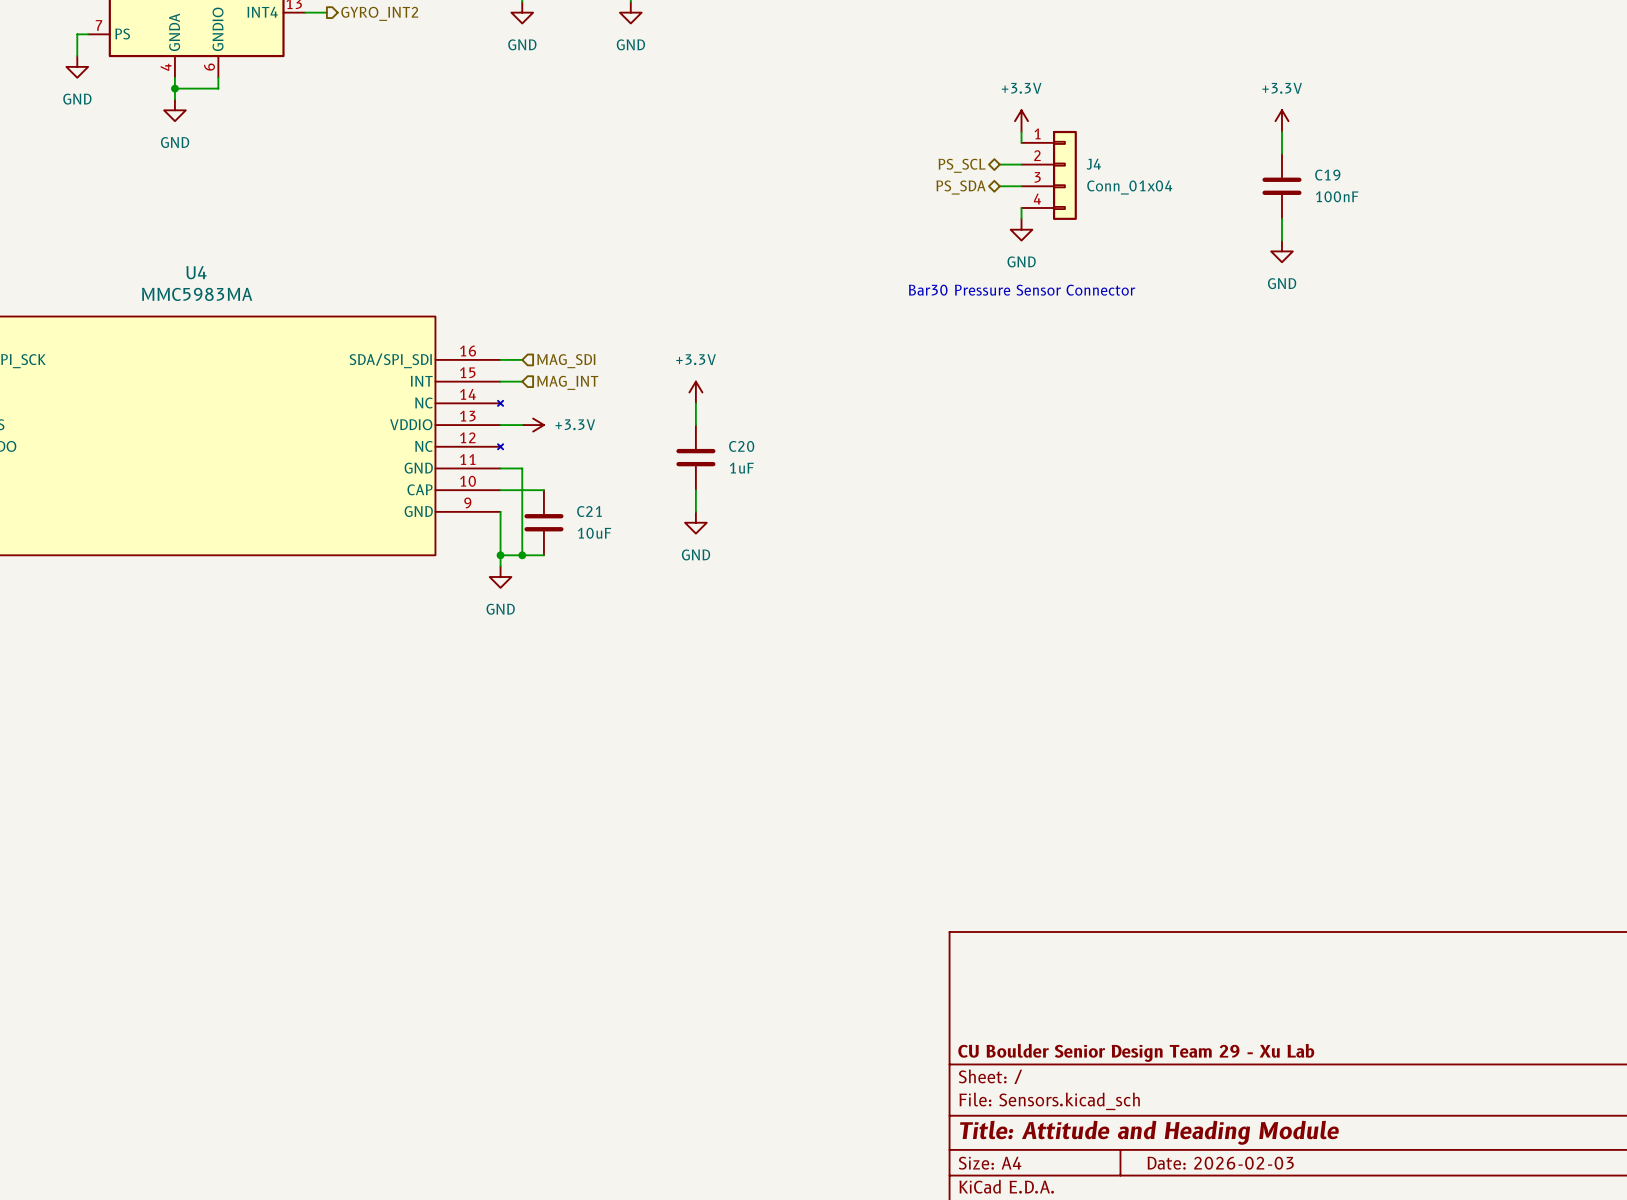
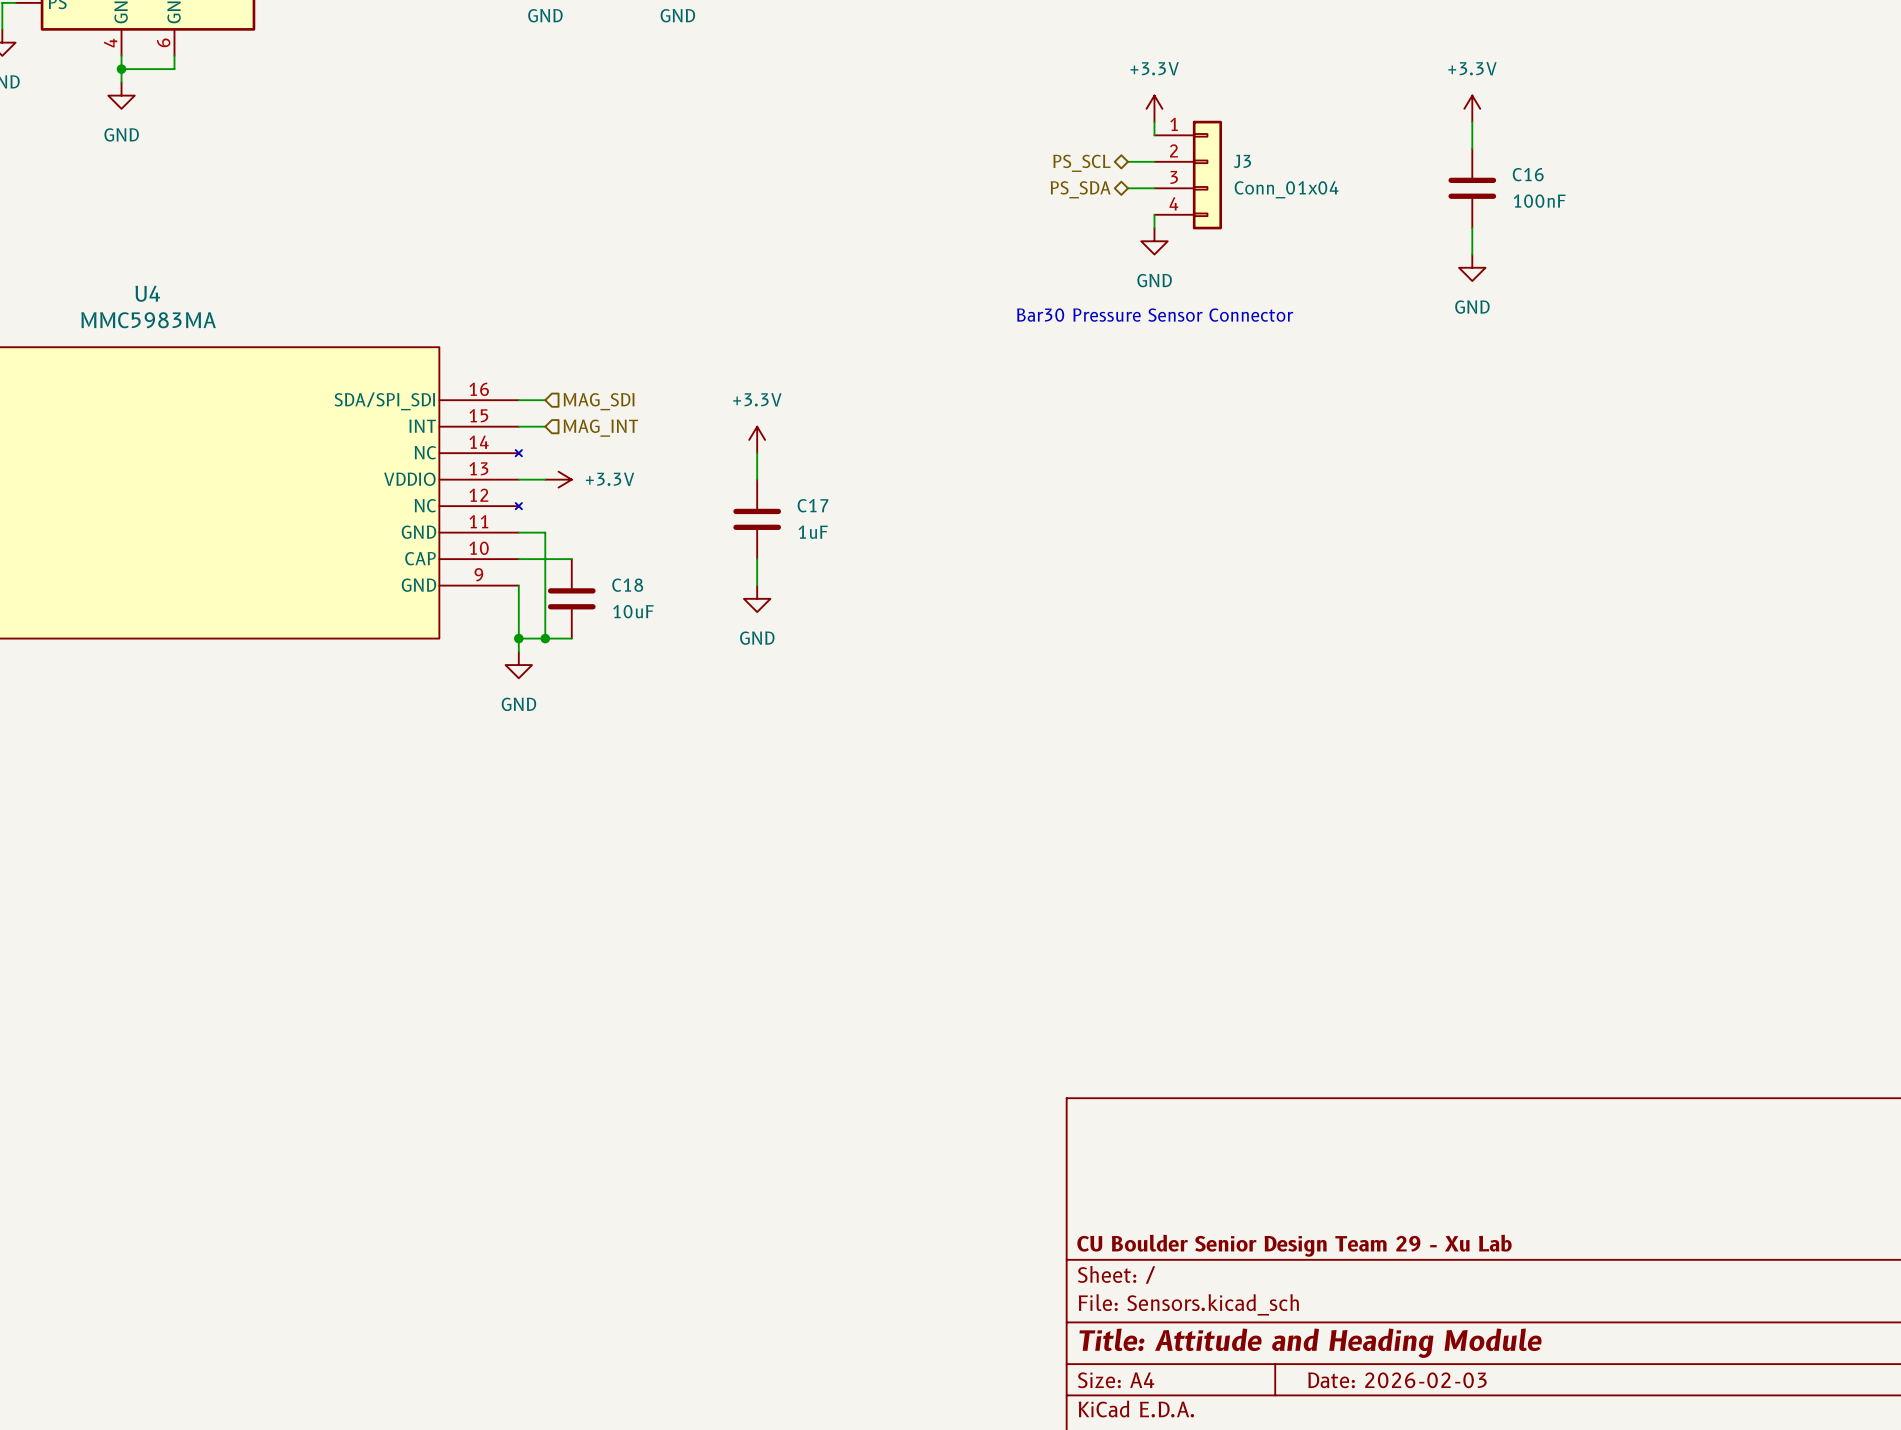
J4 name: J4 (1093, 164) -> J3 (1242, 161)
C19 name: C19 (1327, 175) -> C16 (1528, 174)
C20 name: C20 (741, 446) -> C17 (812, 505)
C21 name: C21 (589, 511) -> C18 (627, 585)

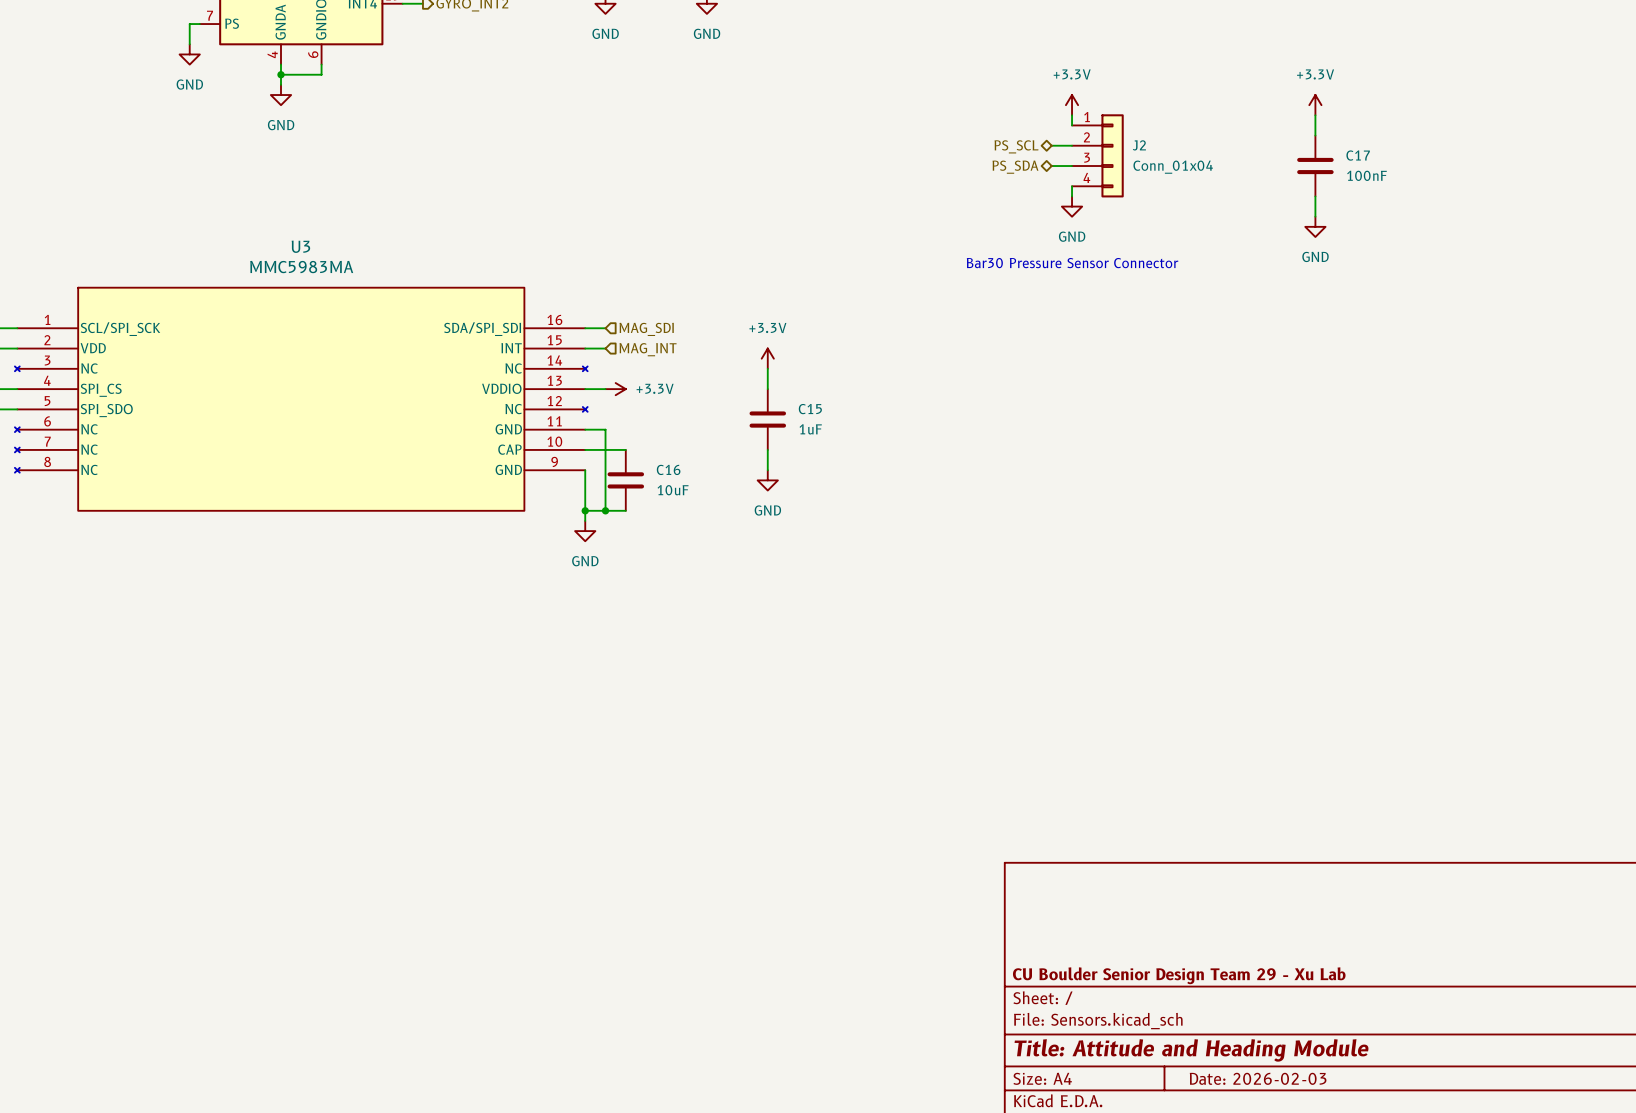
J3 name: J3 (1242, 161) -> J2 (1139, 145)
C16 name: C16 (1528, 174) -> C17 (1358, 155)
U4 name: U4 (147, 293) -> U3 (300, 246)
C17 name: C17 (812, 505) -> C15 (810, 409)
C18 name: C18 (627, 585) -> C16 (668, 469)

